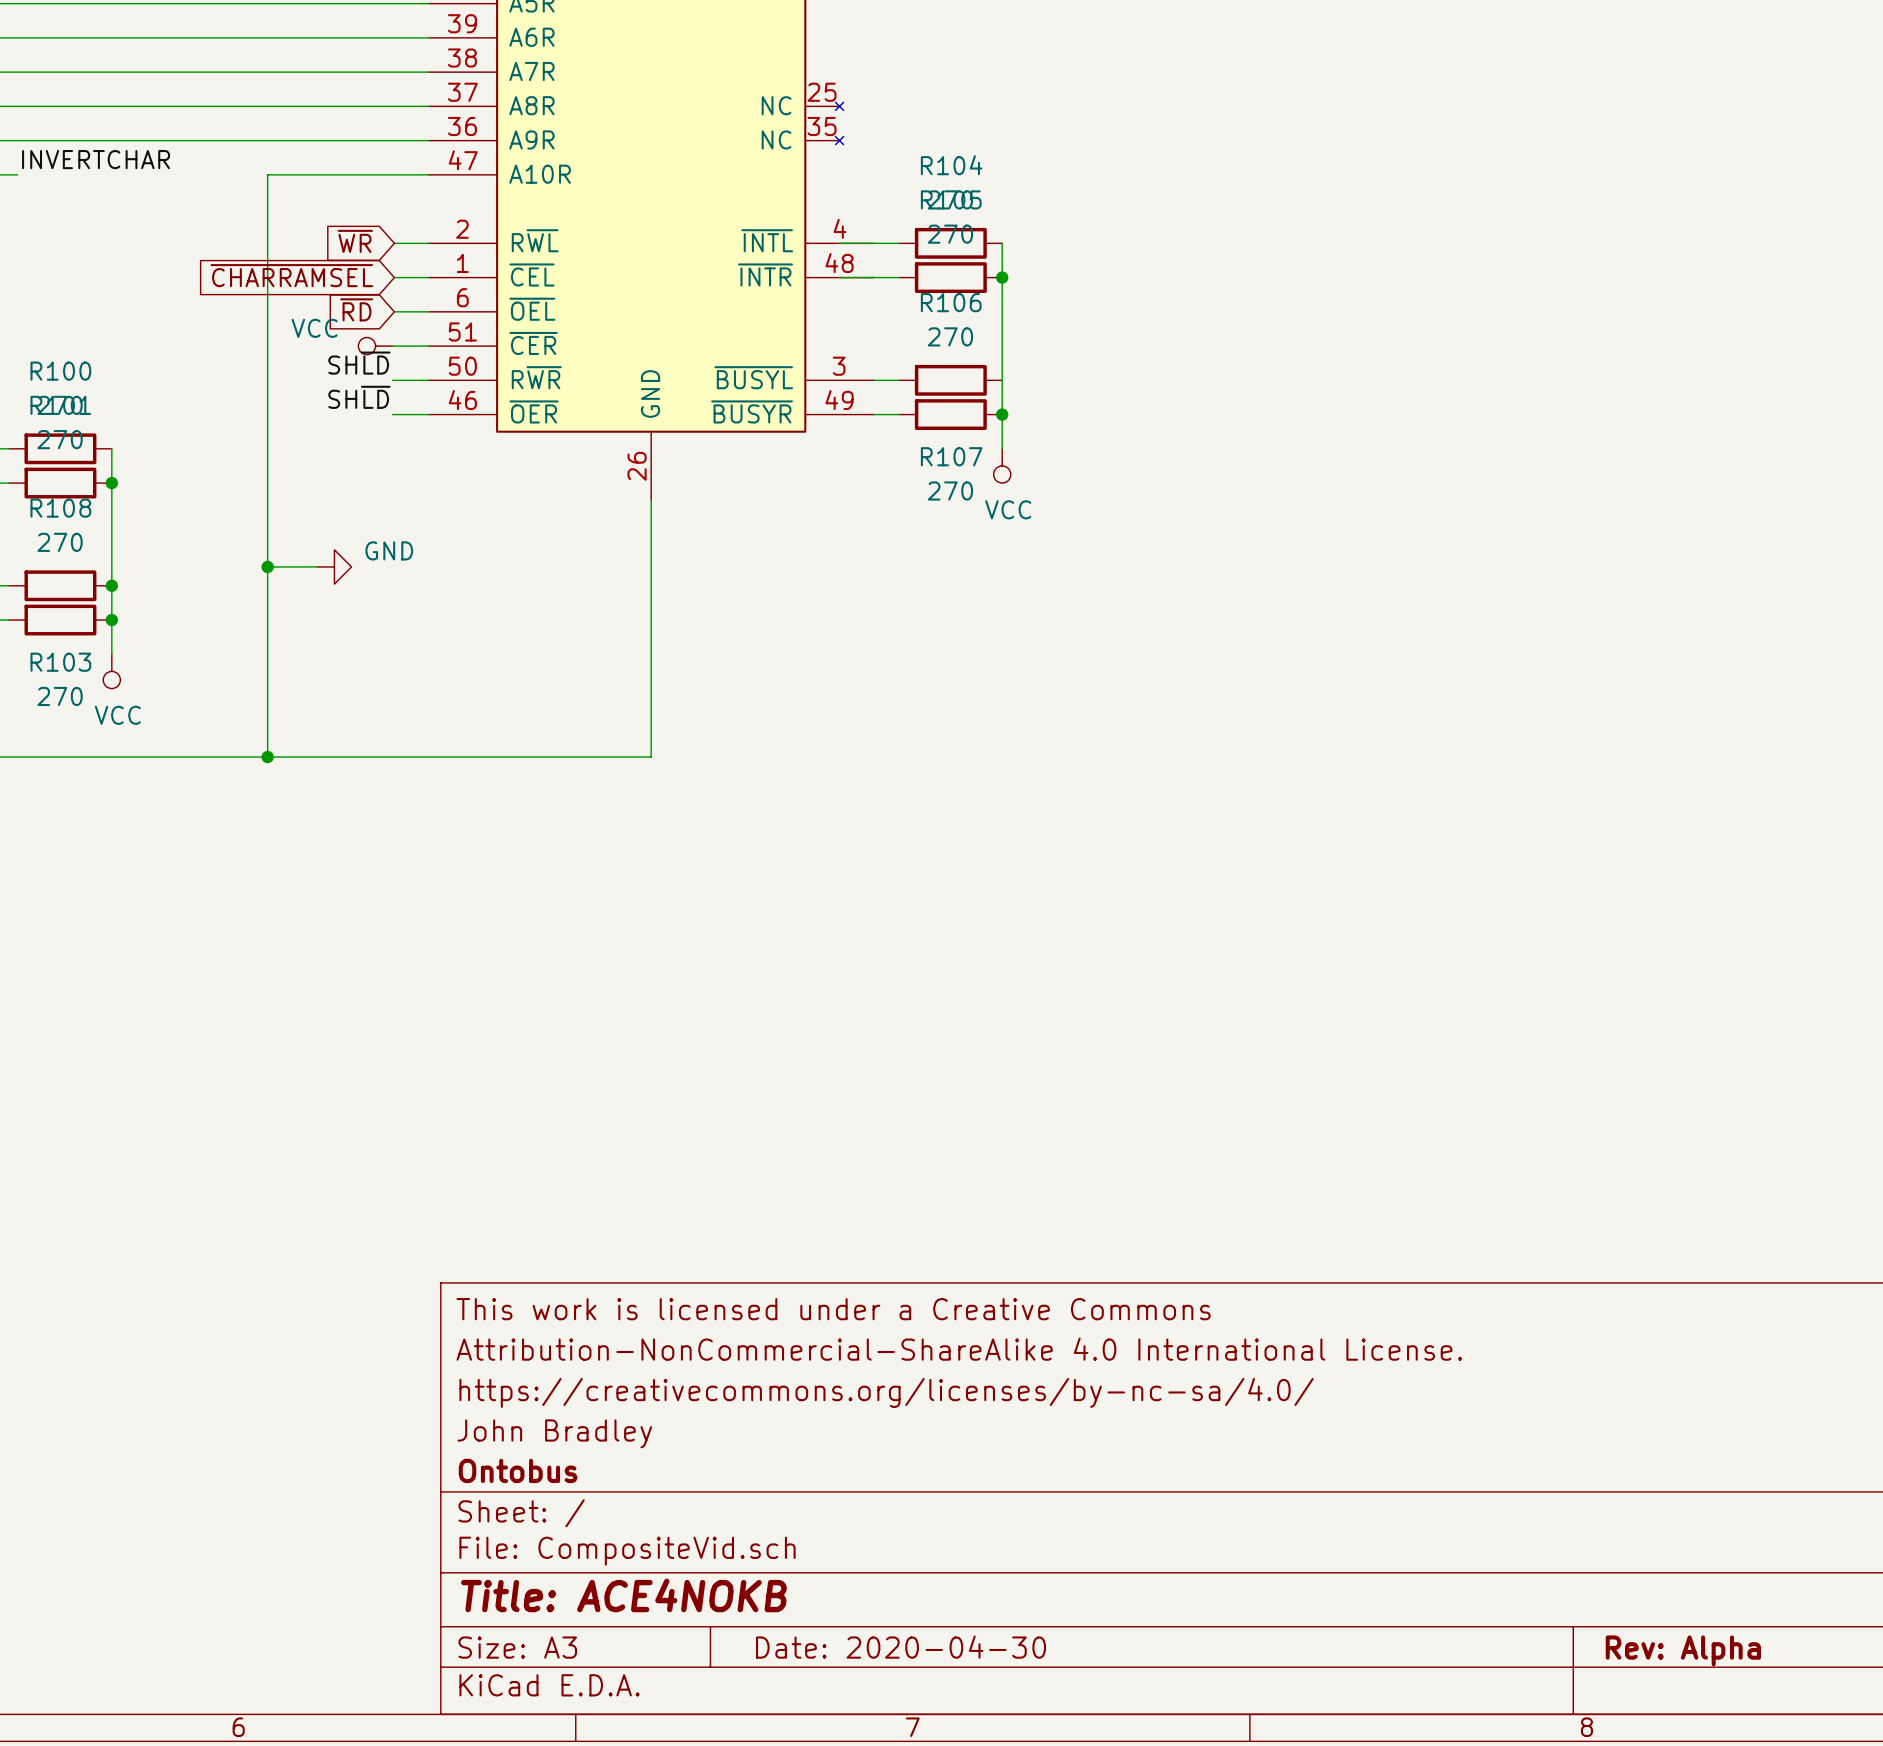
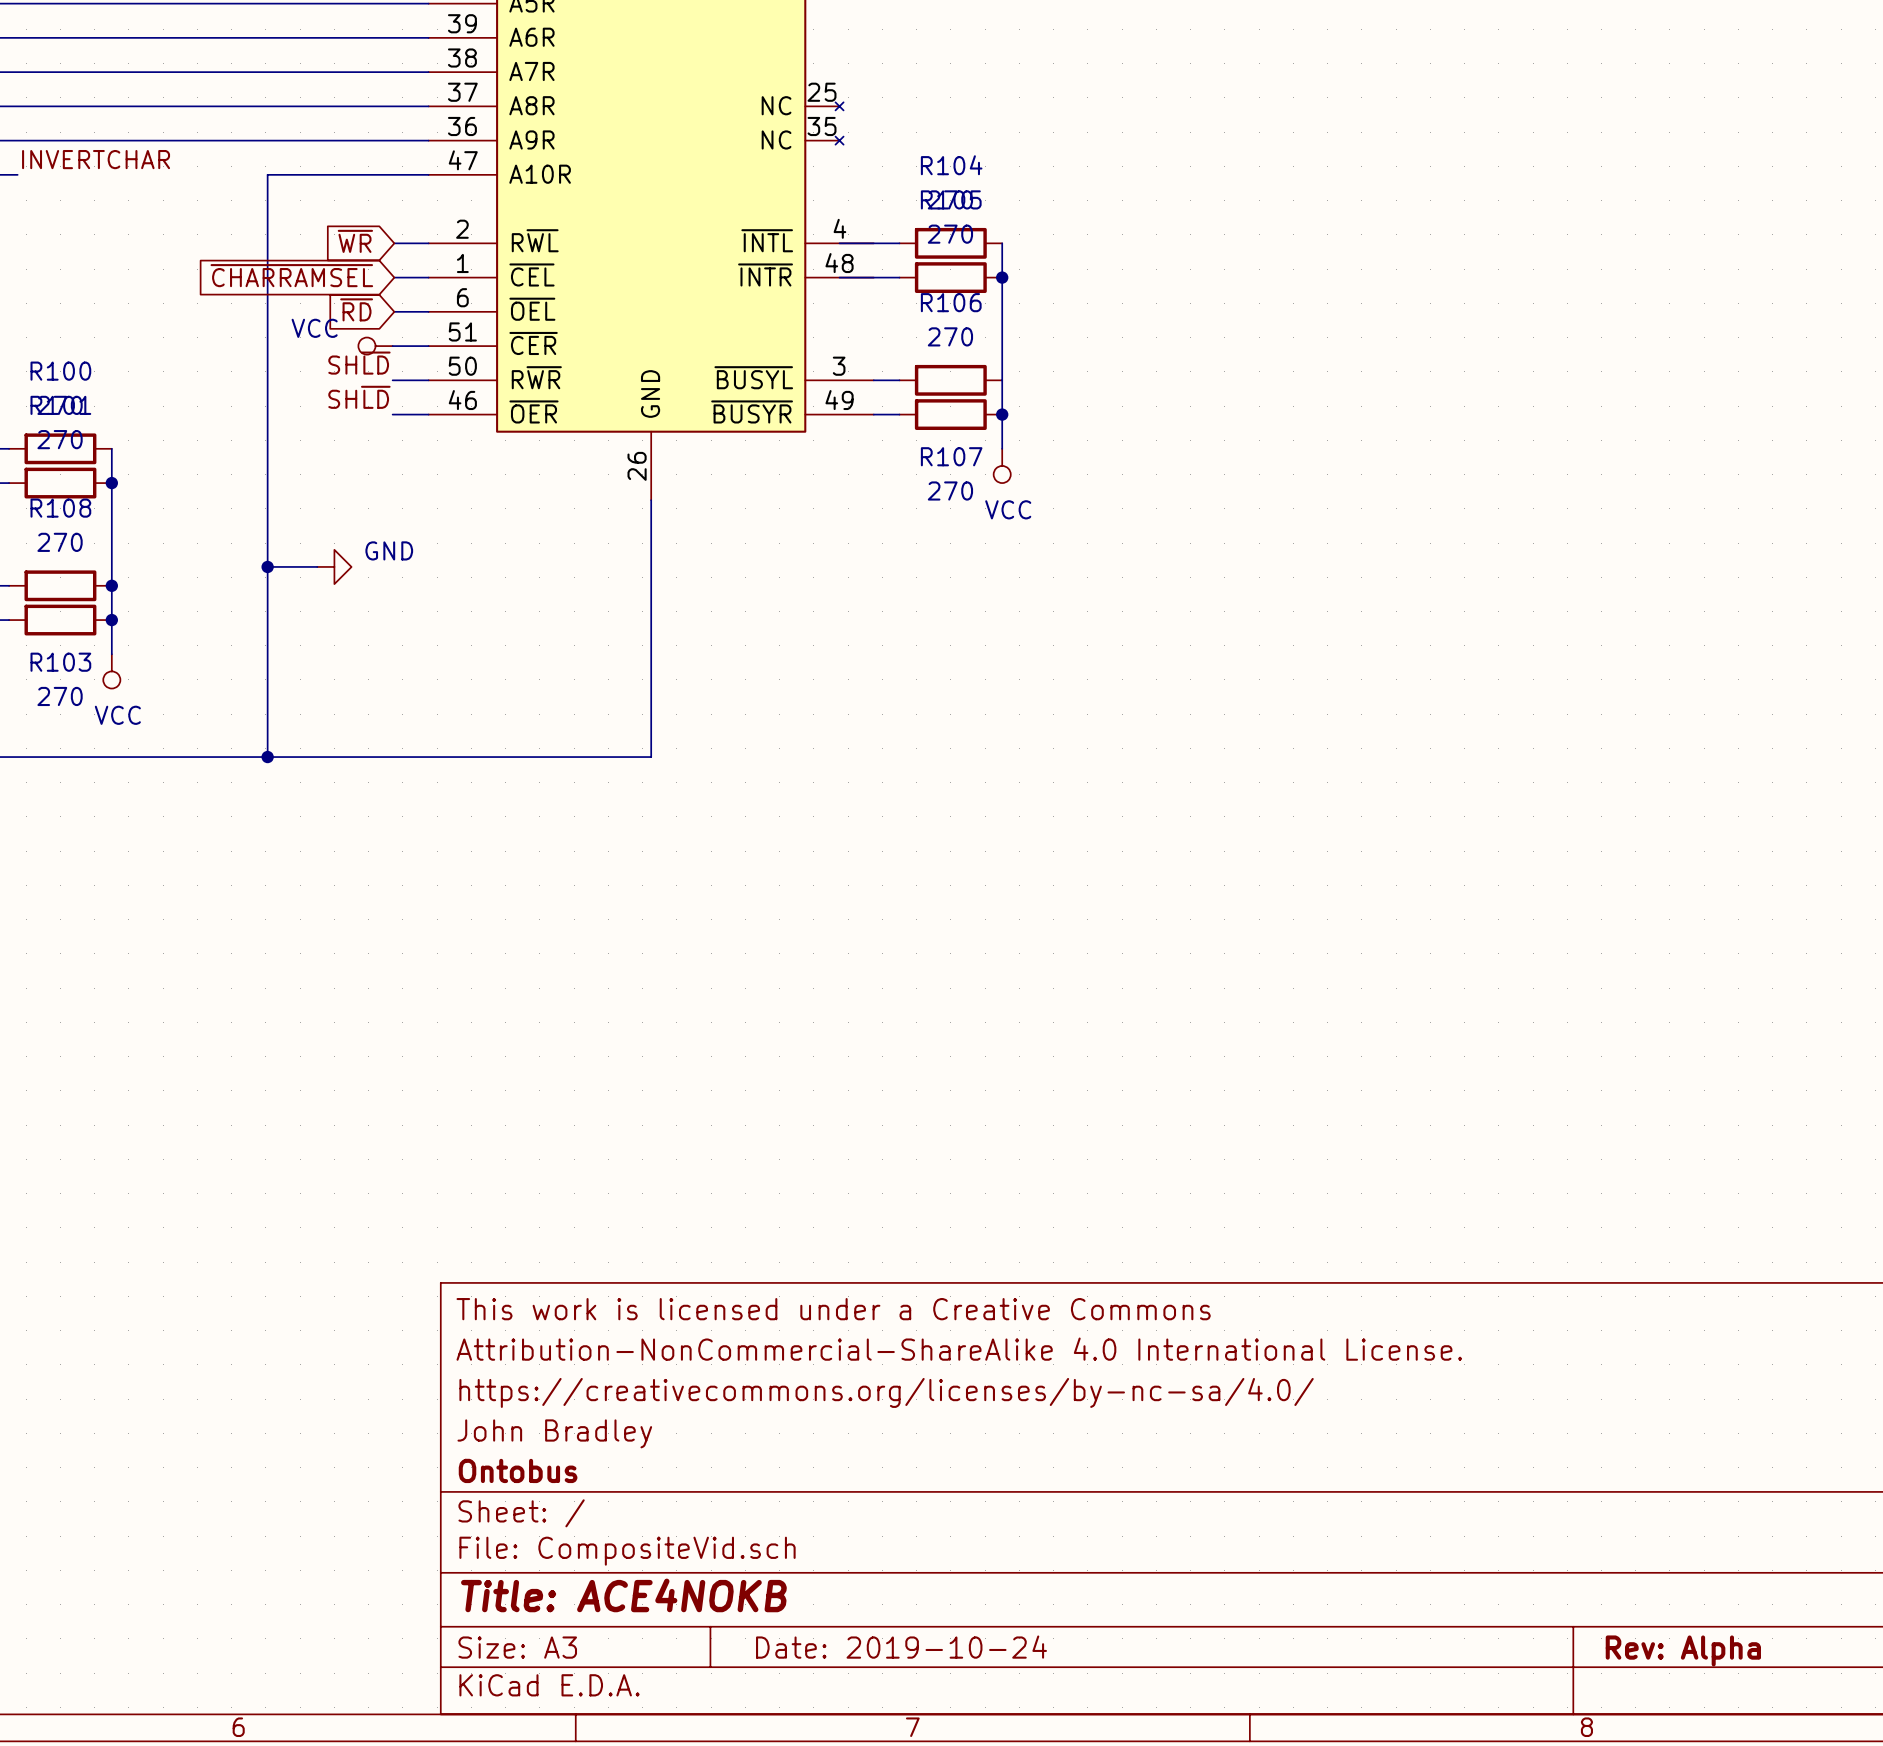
title block: Date: 2020-04-30 (901, 1647) -> Date: 2019-10-24 (901, 1647)

